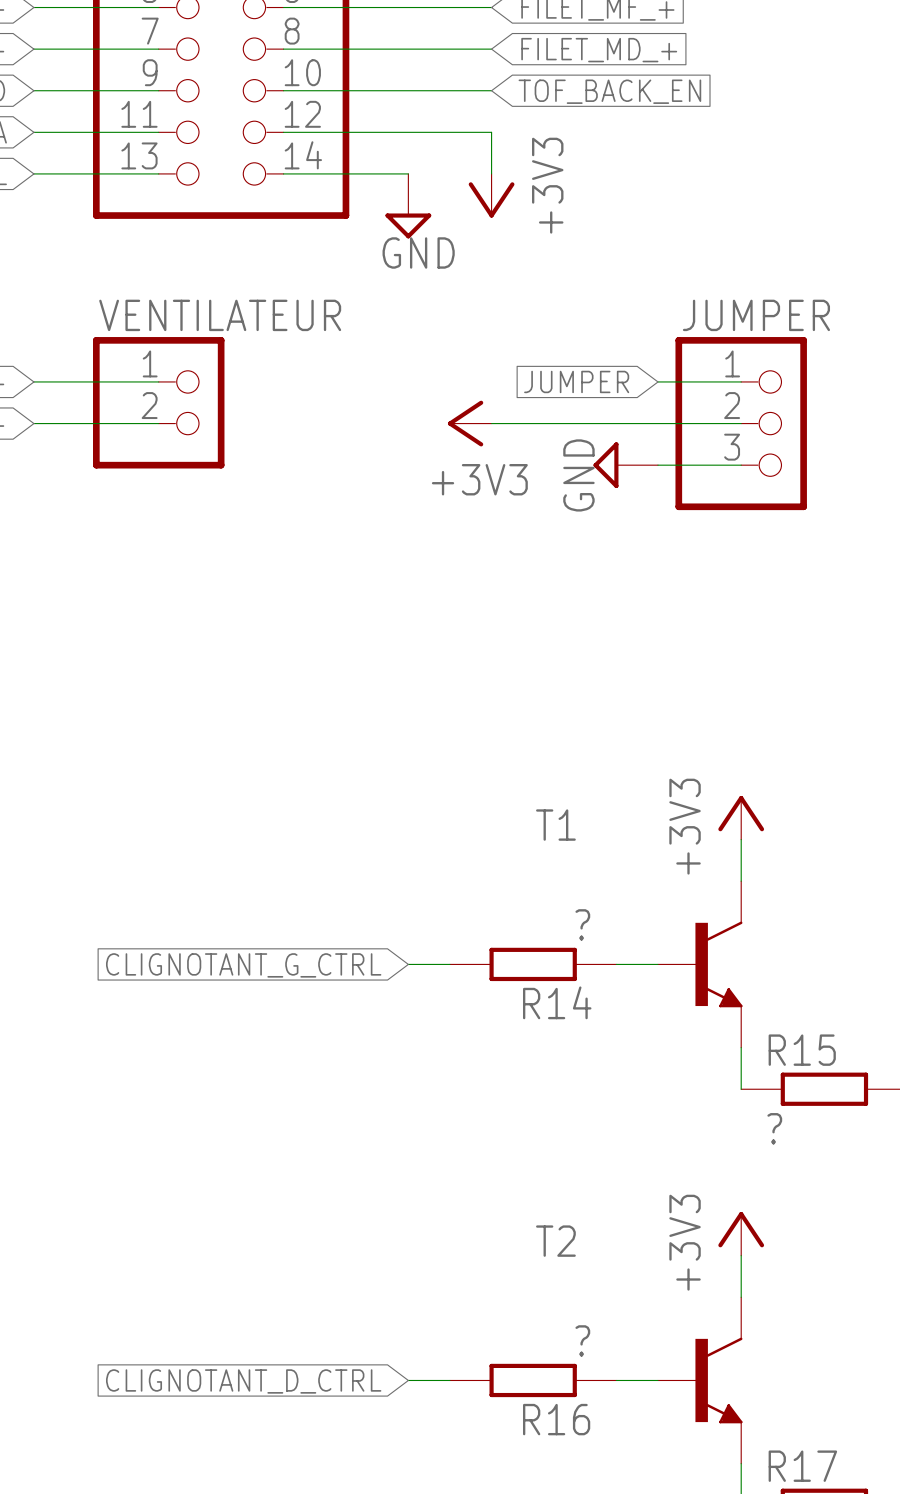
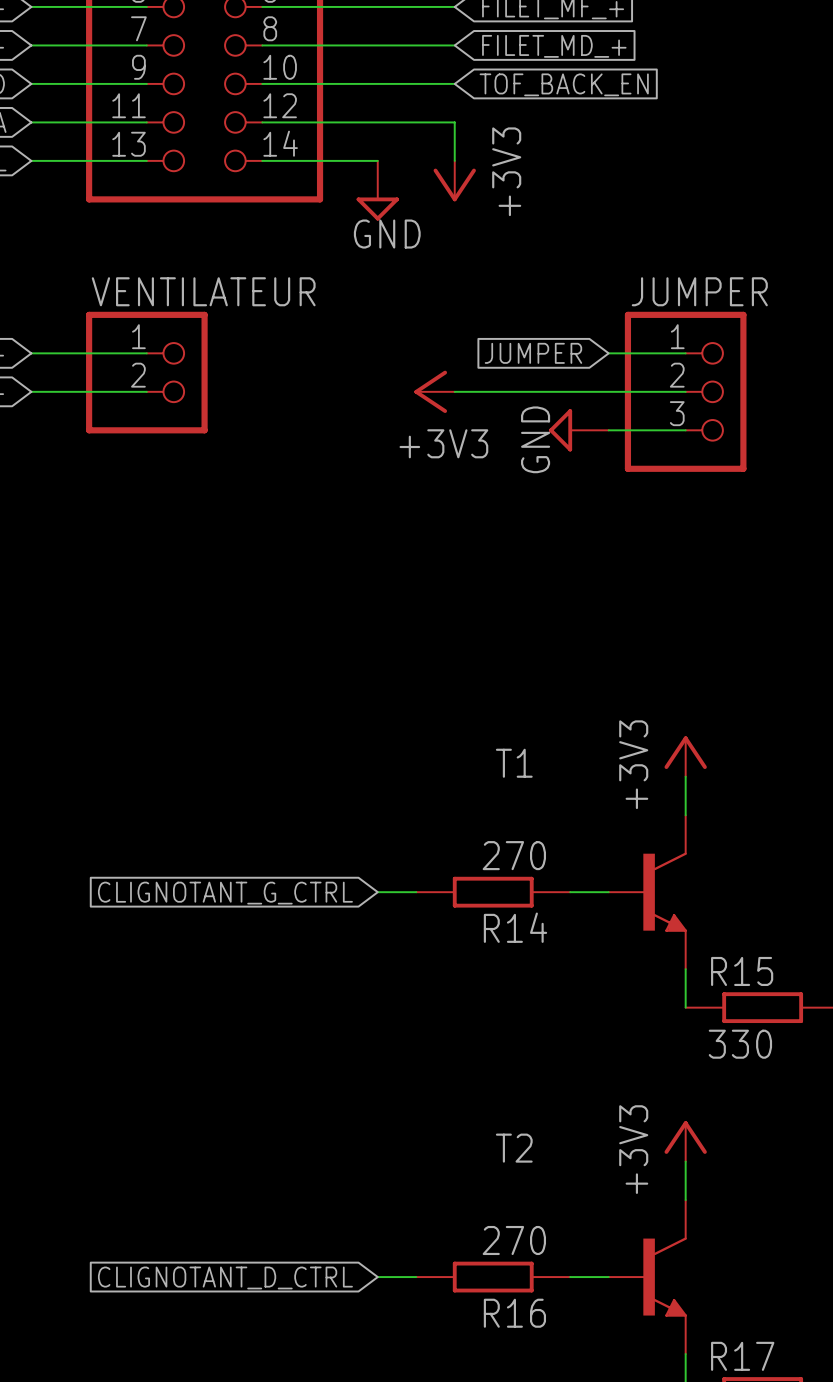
R14 value: ? (582, 924) -> 270 (514, 855)
R15 value: ? (774, 1128) -> 330 (740, 1044)
R16 value: ? (582, 1340) -> 270 (514, 1240)

